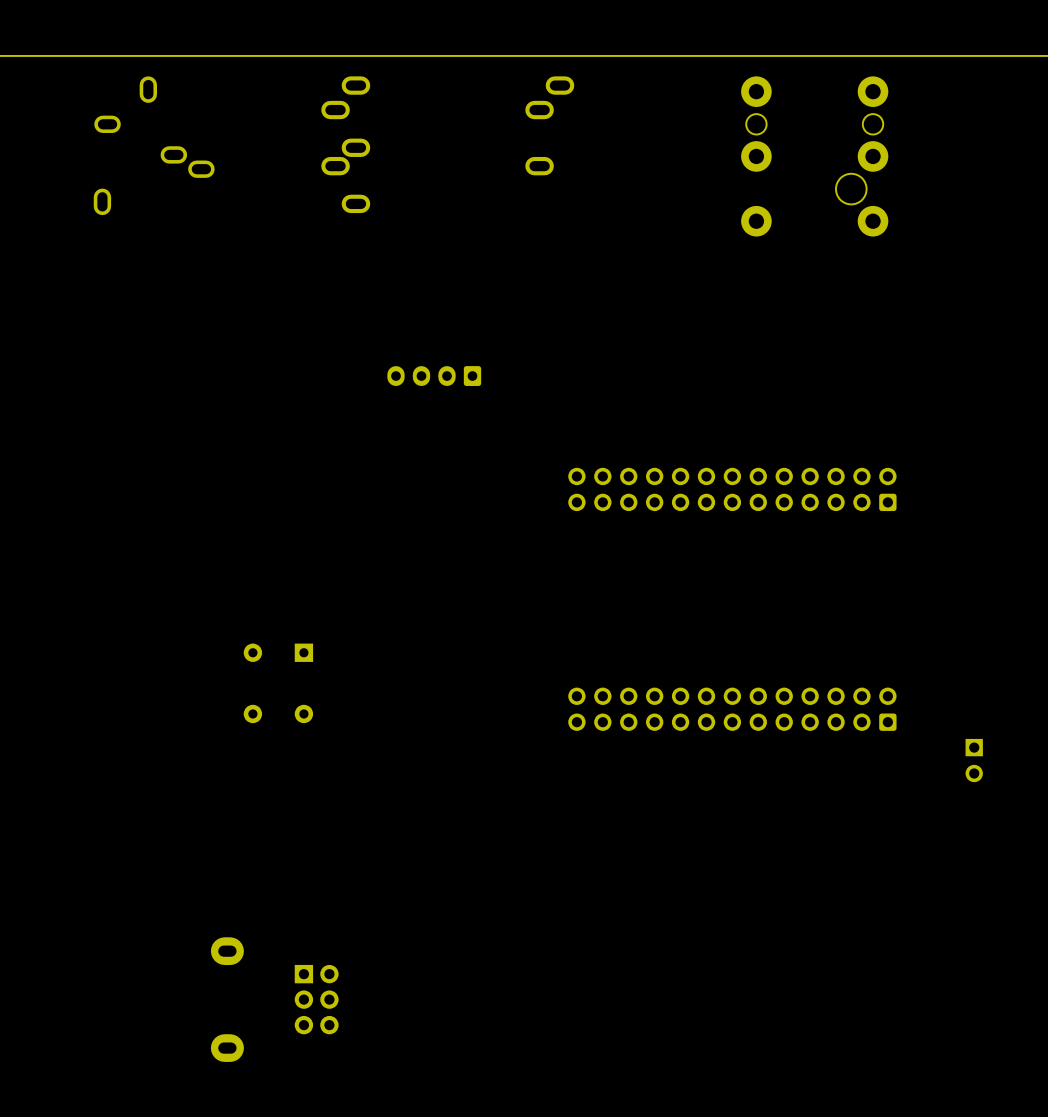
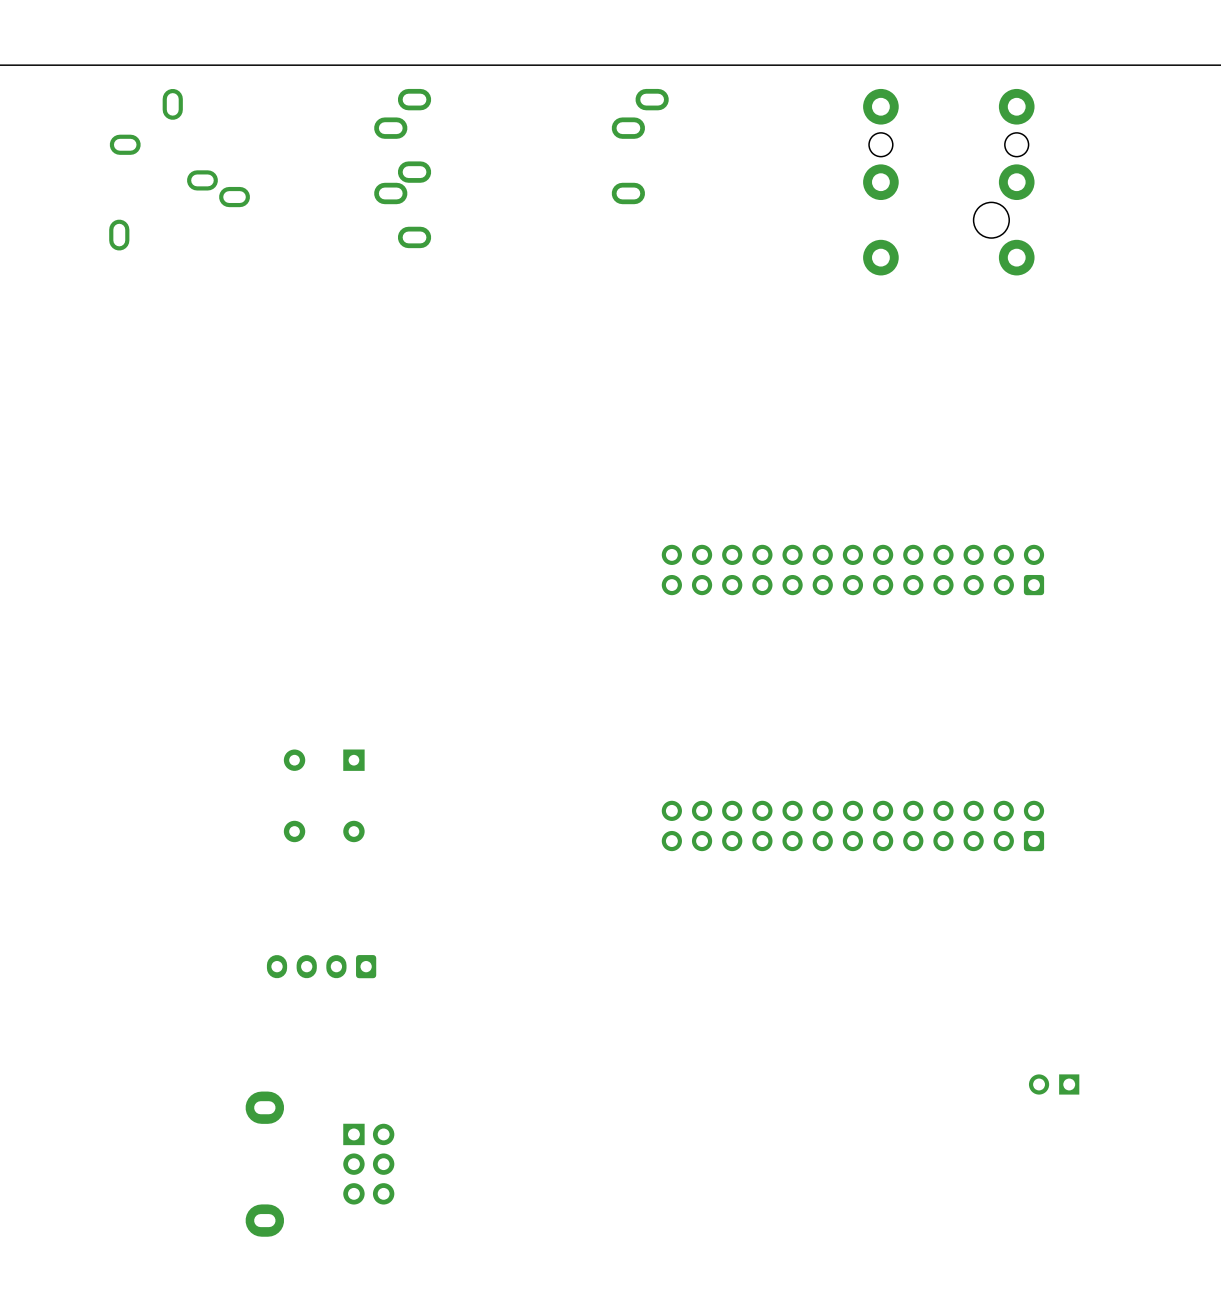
part: (434, 376) -> none
part rotation: 0° (974, 760) -> 90° clockwise (1054, 1084)
part position: (974, 760) -> (1054, 1084)
part: none -> (321, 966)

